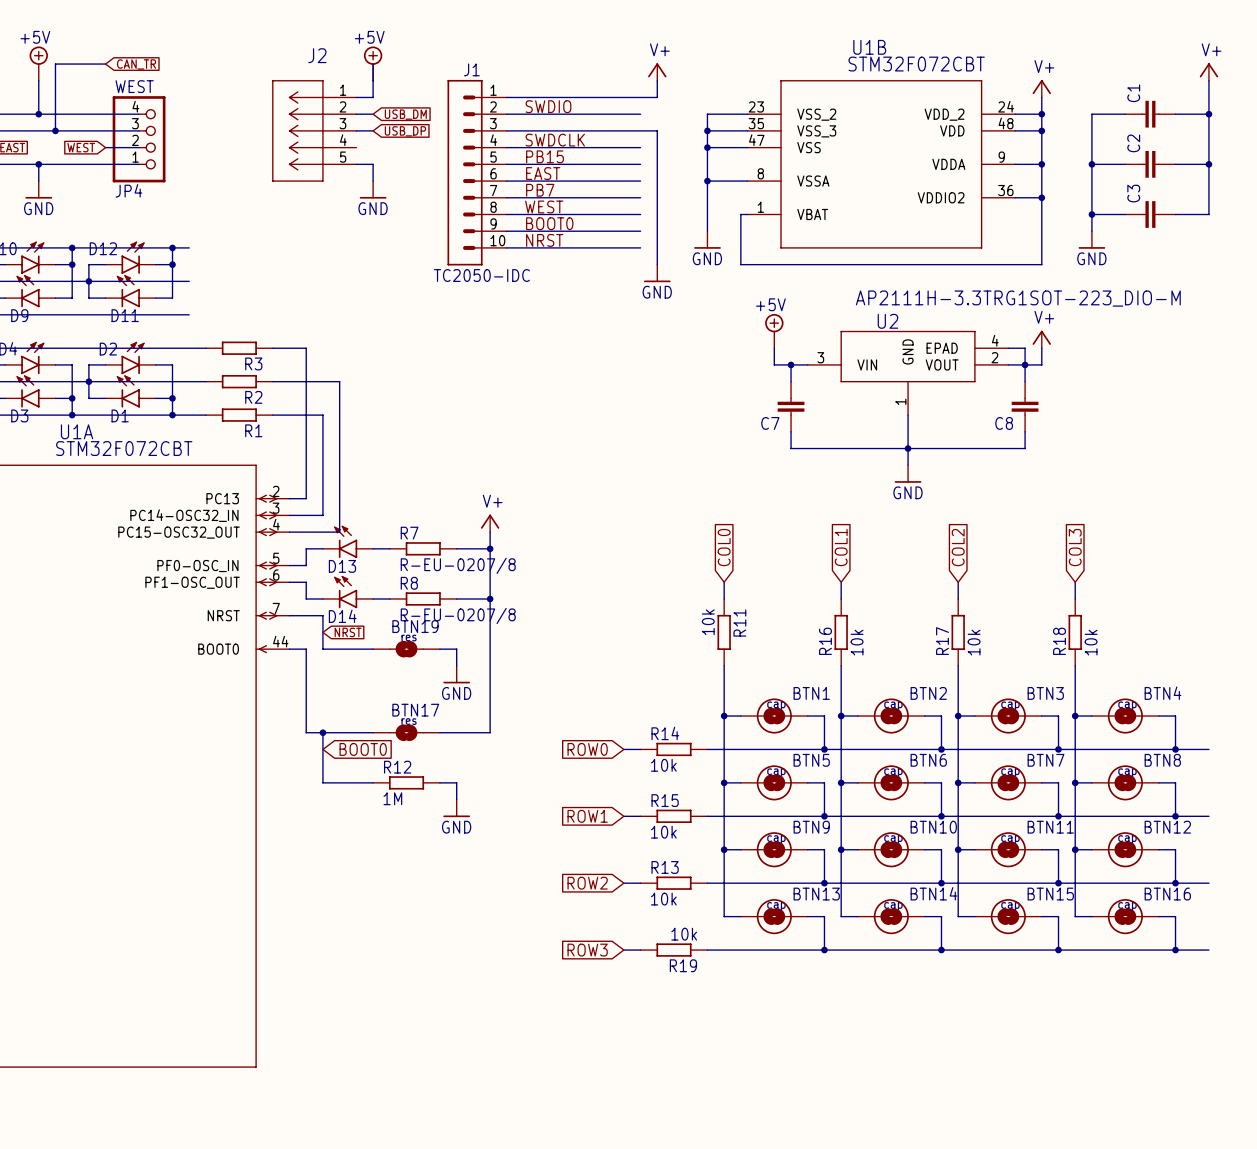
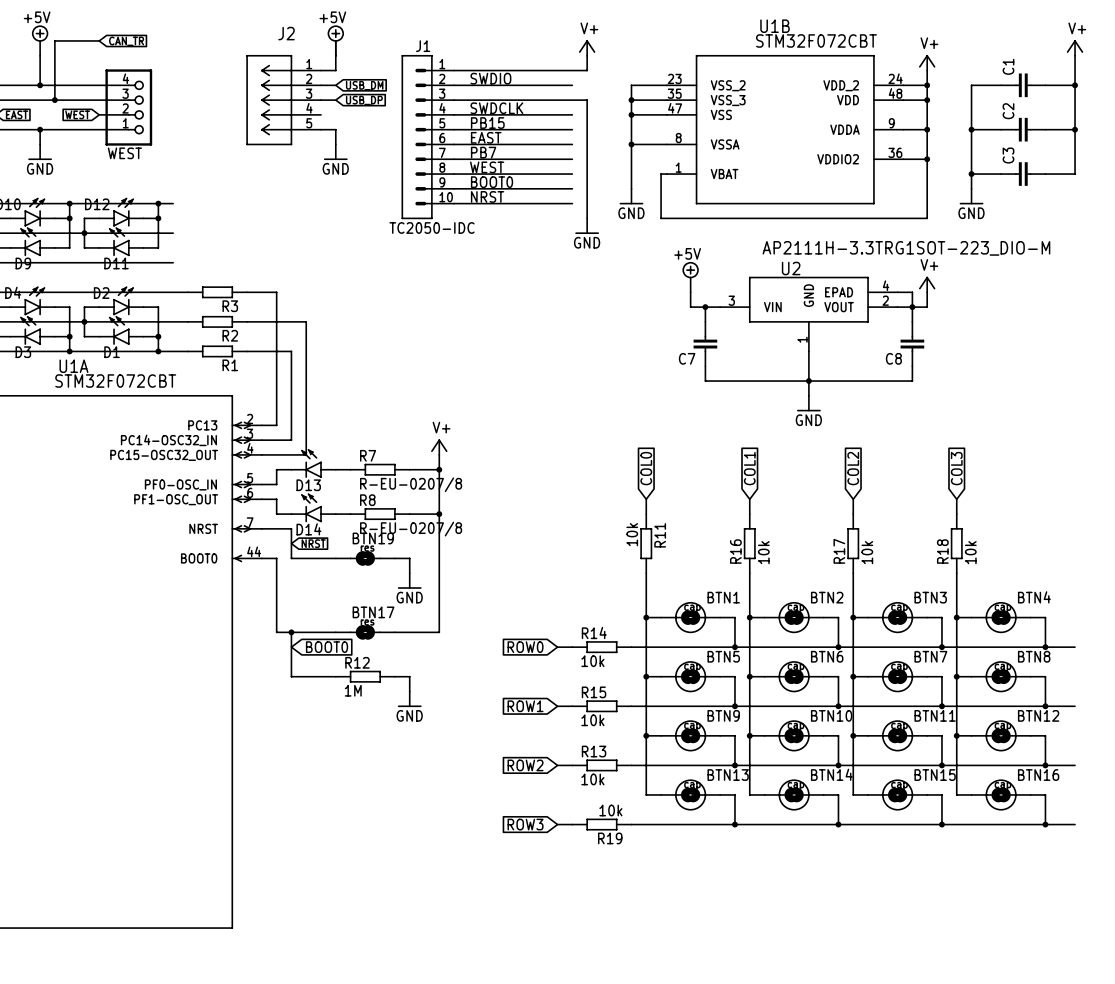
JP4 value: WEST (134, 86) -> none
JP4 name: JP4 (128, 190) -> WEST (124, 153)

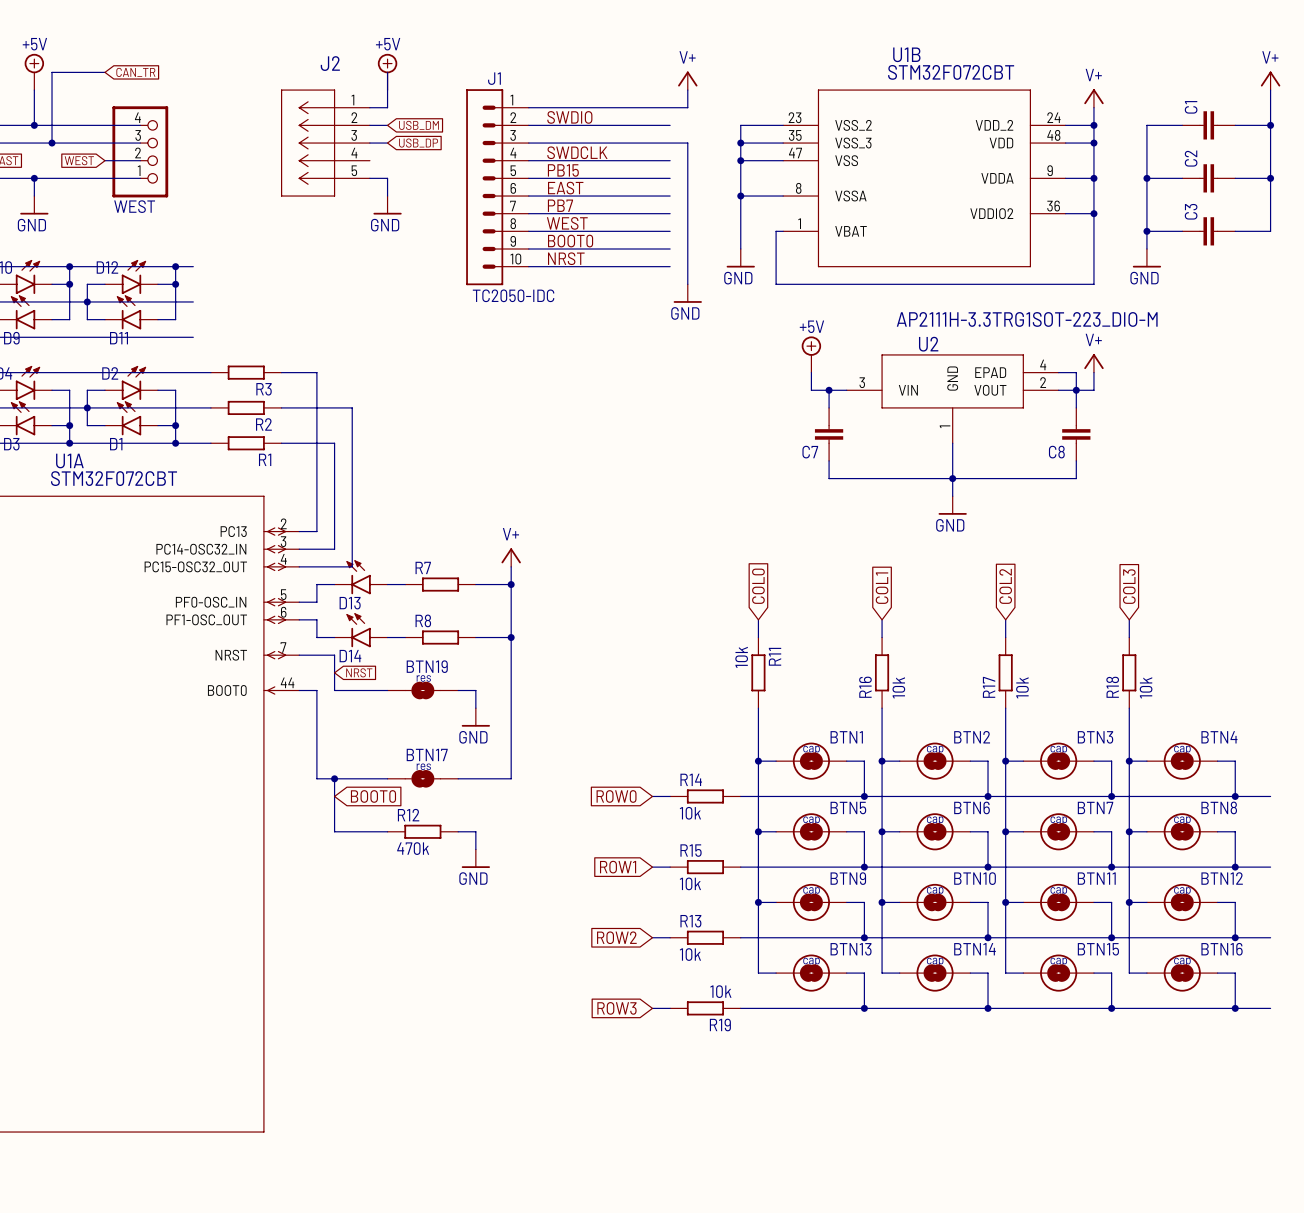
R7 value: R-EU-0207/8 (411, 484) -> none
R8 value: R-EU-0207/8 (411, 529) -> none
R12 value: 1M (353, 690) -> 470k (413, 848)

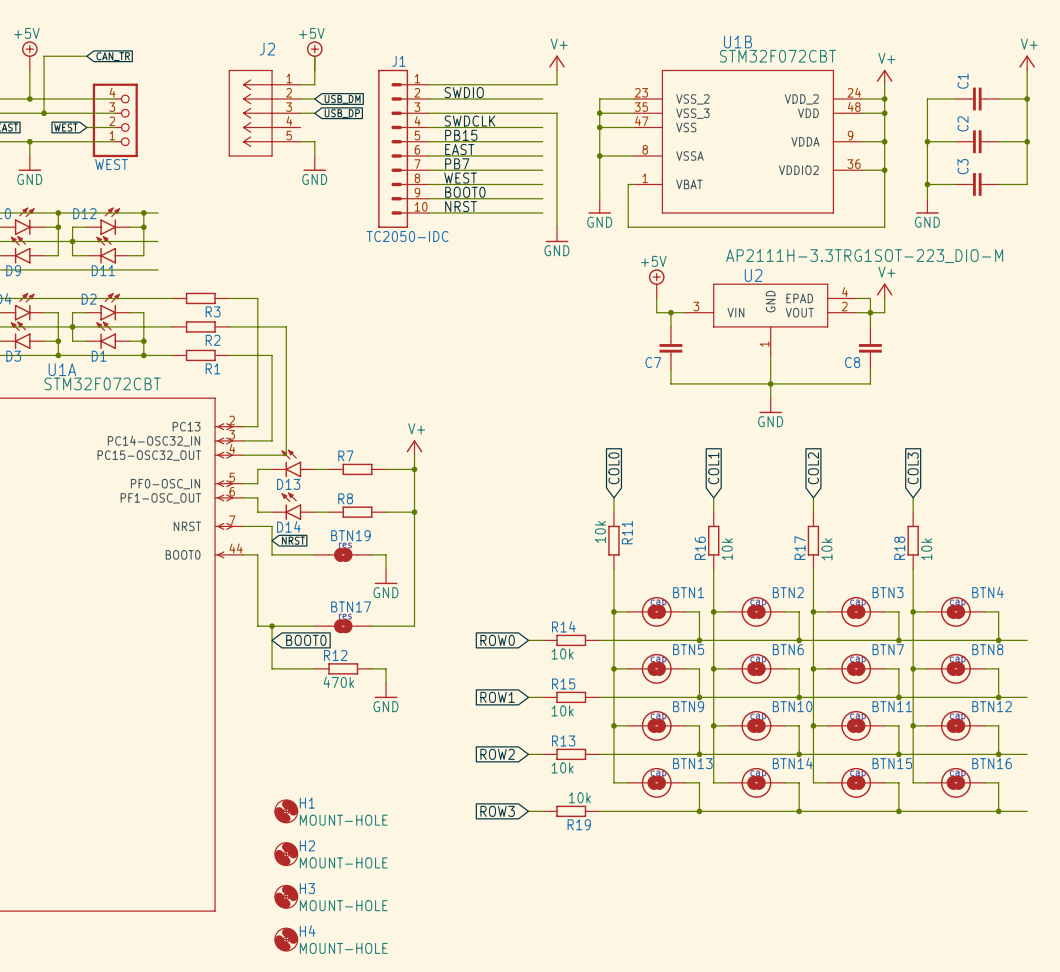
H1: none -> MOUNT-HOLE (286, 811)
H2: none -> MOUNT-HOLE (286, 854)
H3: none -> MOUNT-HOLE (286, 896)
H4: none -> MOUNT-HOLE (286, 939)

